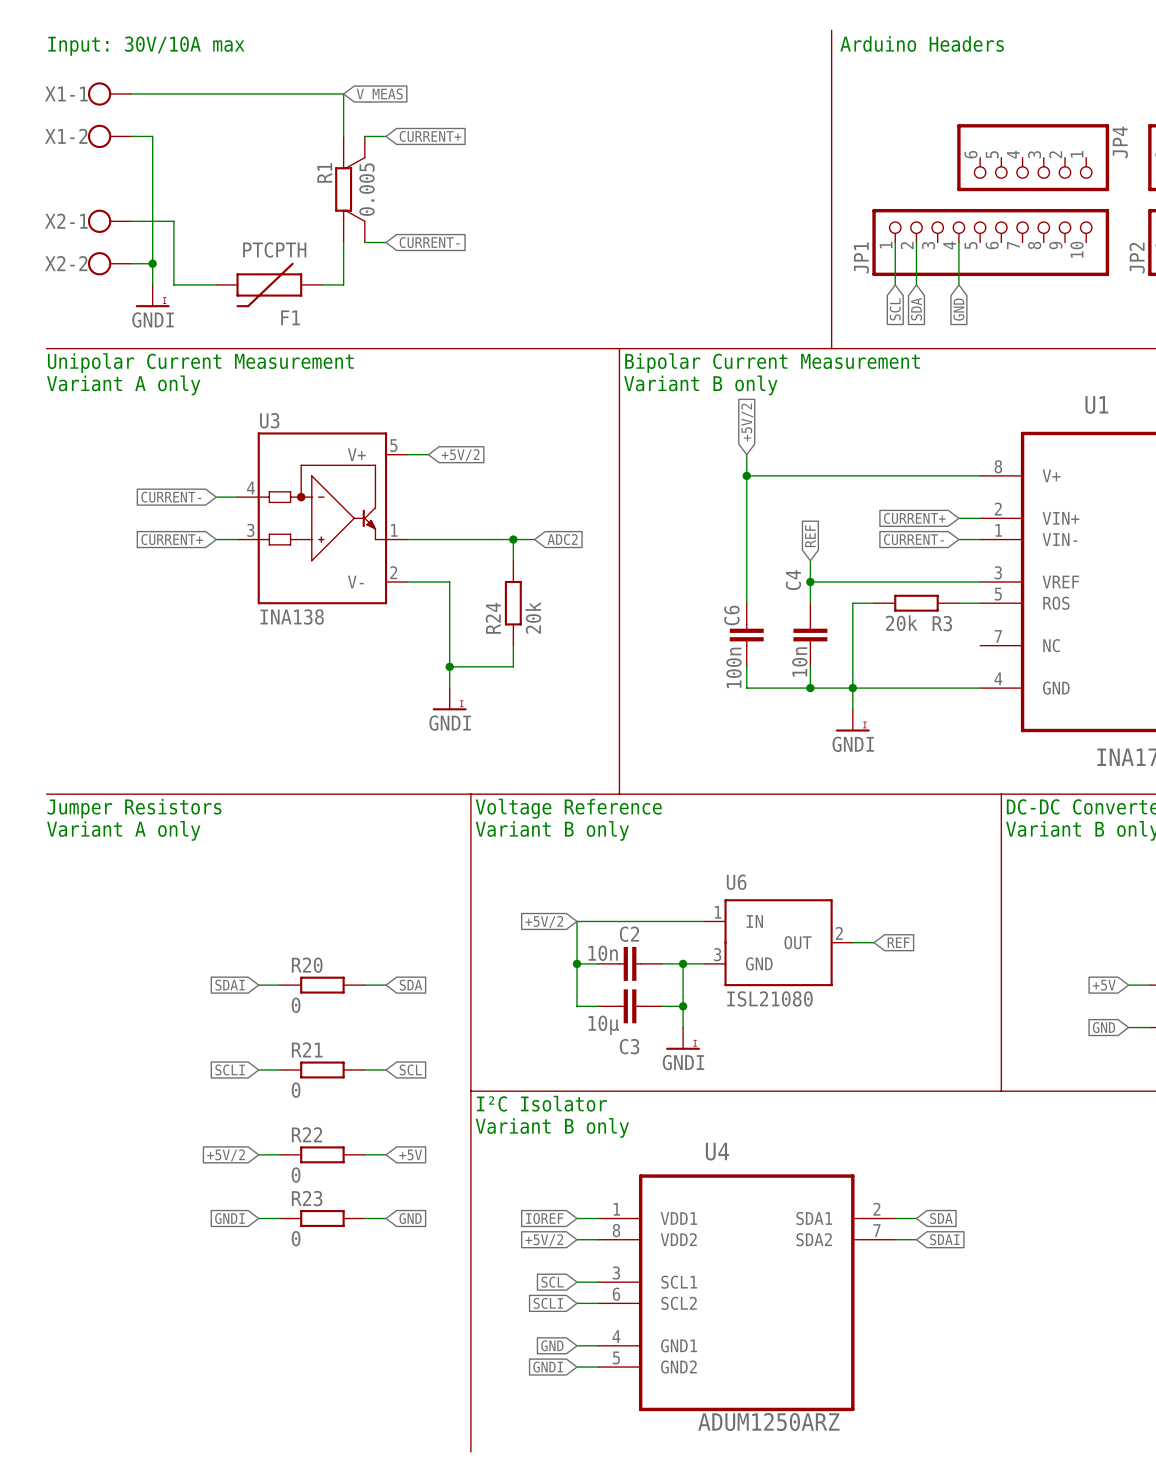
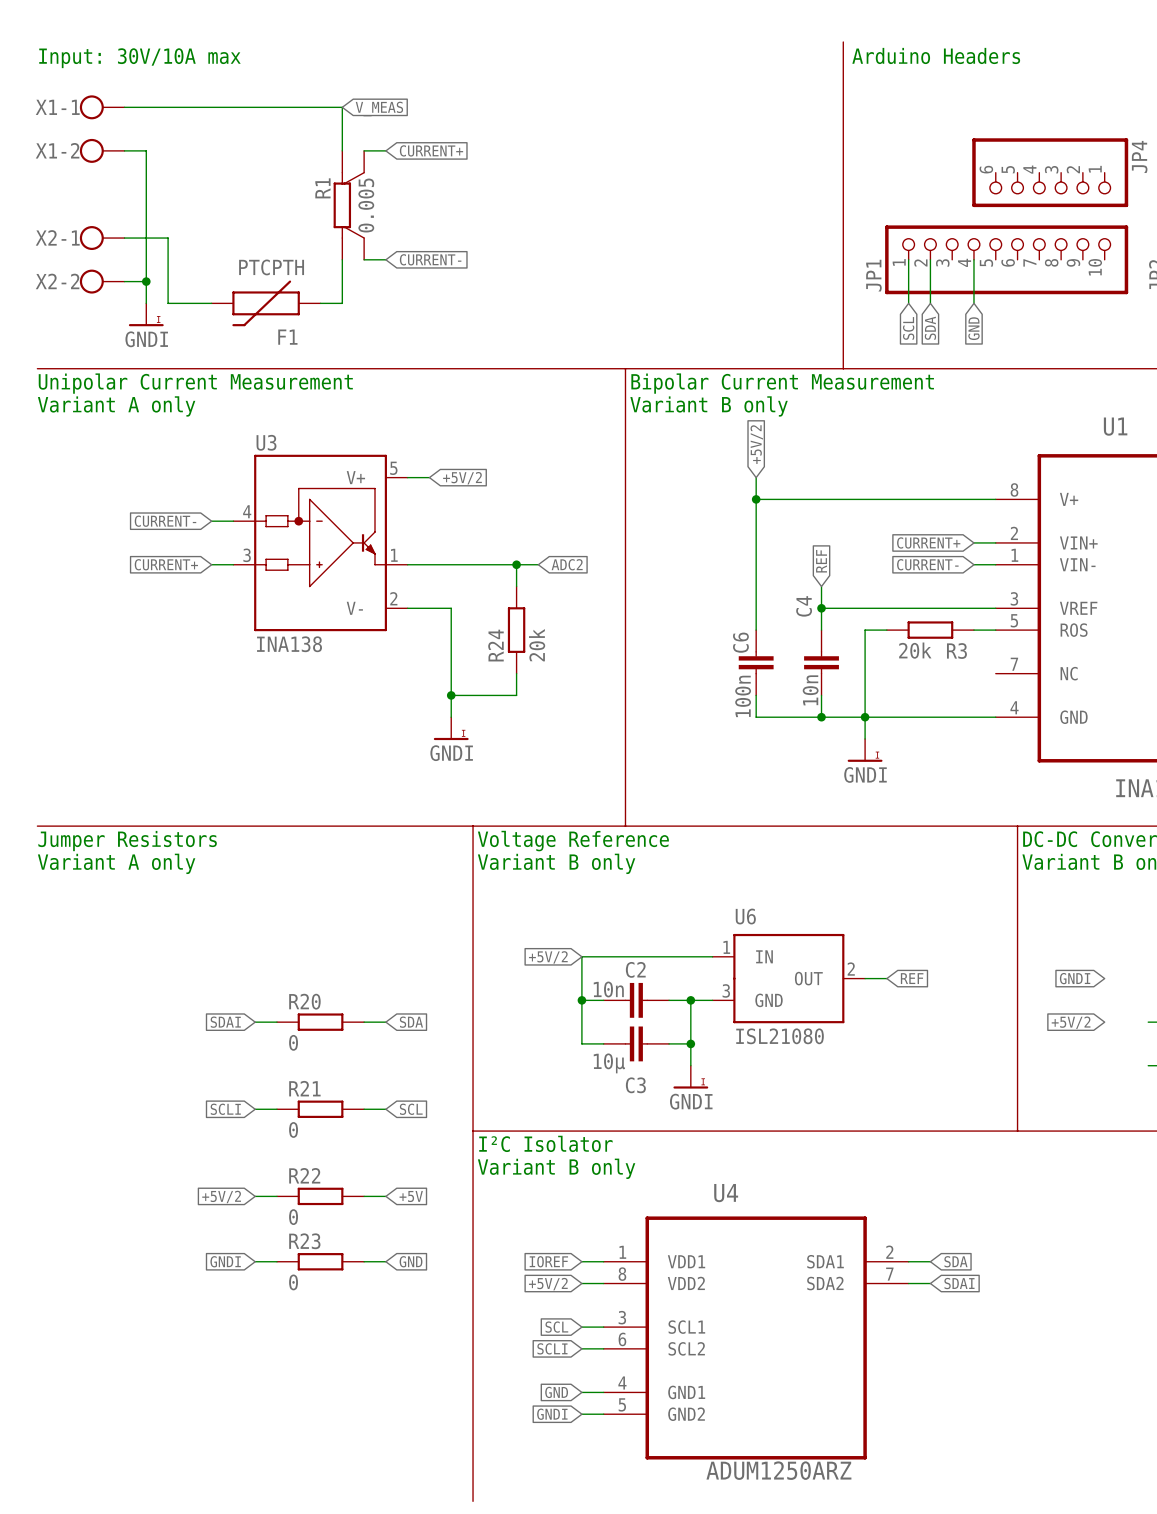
global label: none -> GNDI (1075, 978)
global label: +5V (1104, 985) -> +5V/2 (1071, 1022)
global label: GND (1104, 1027) -> none

